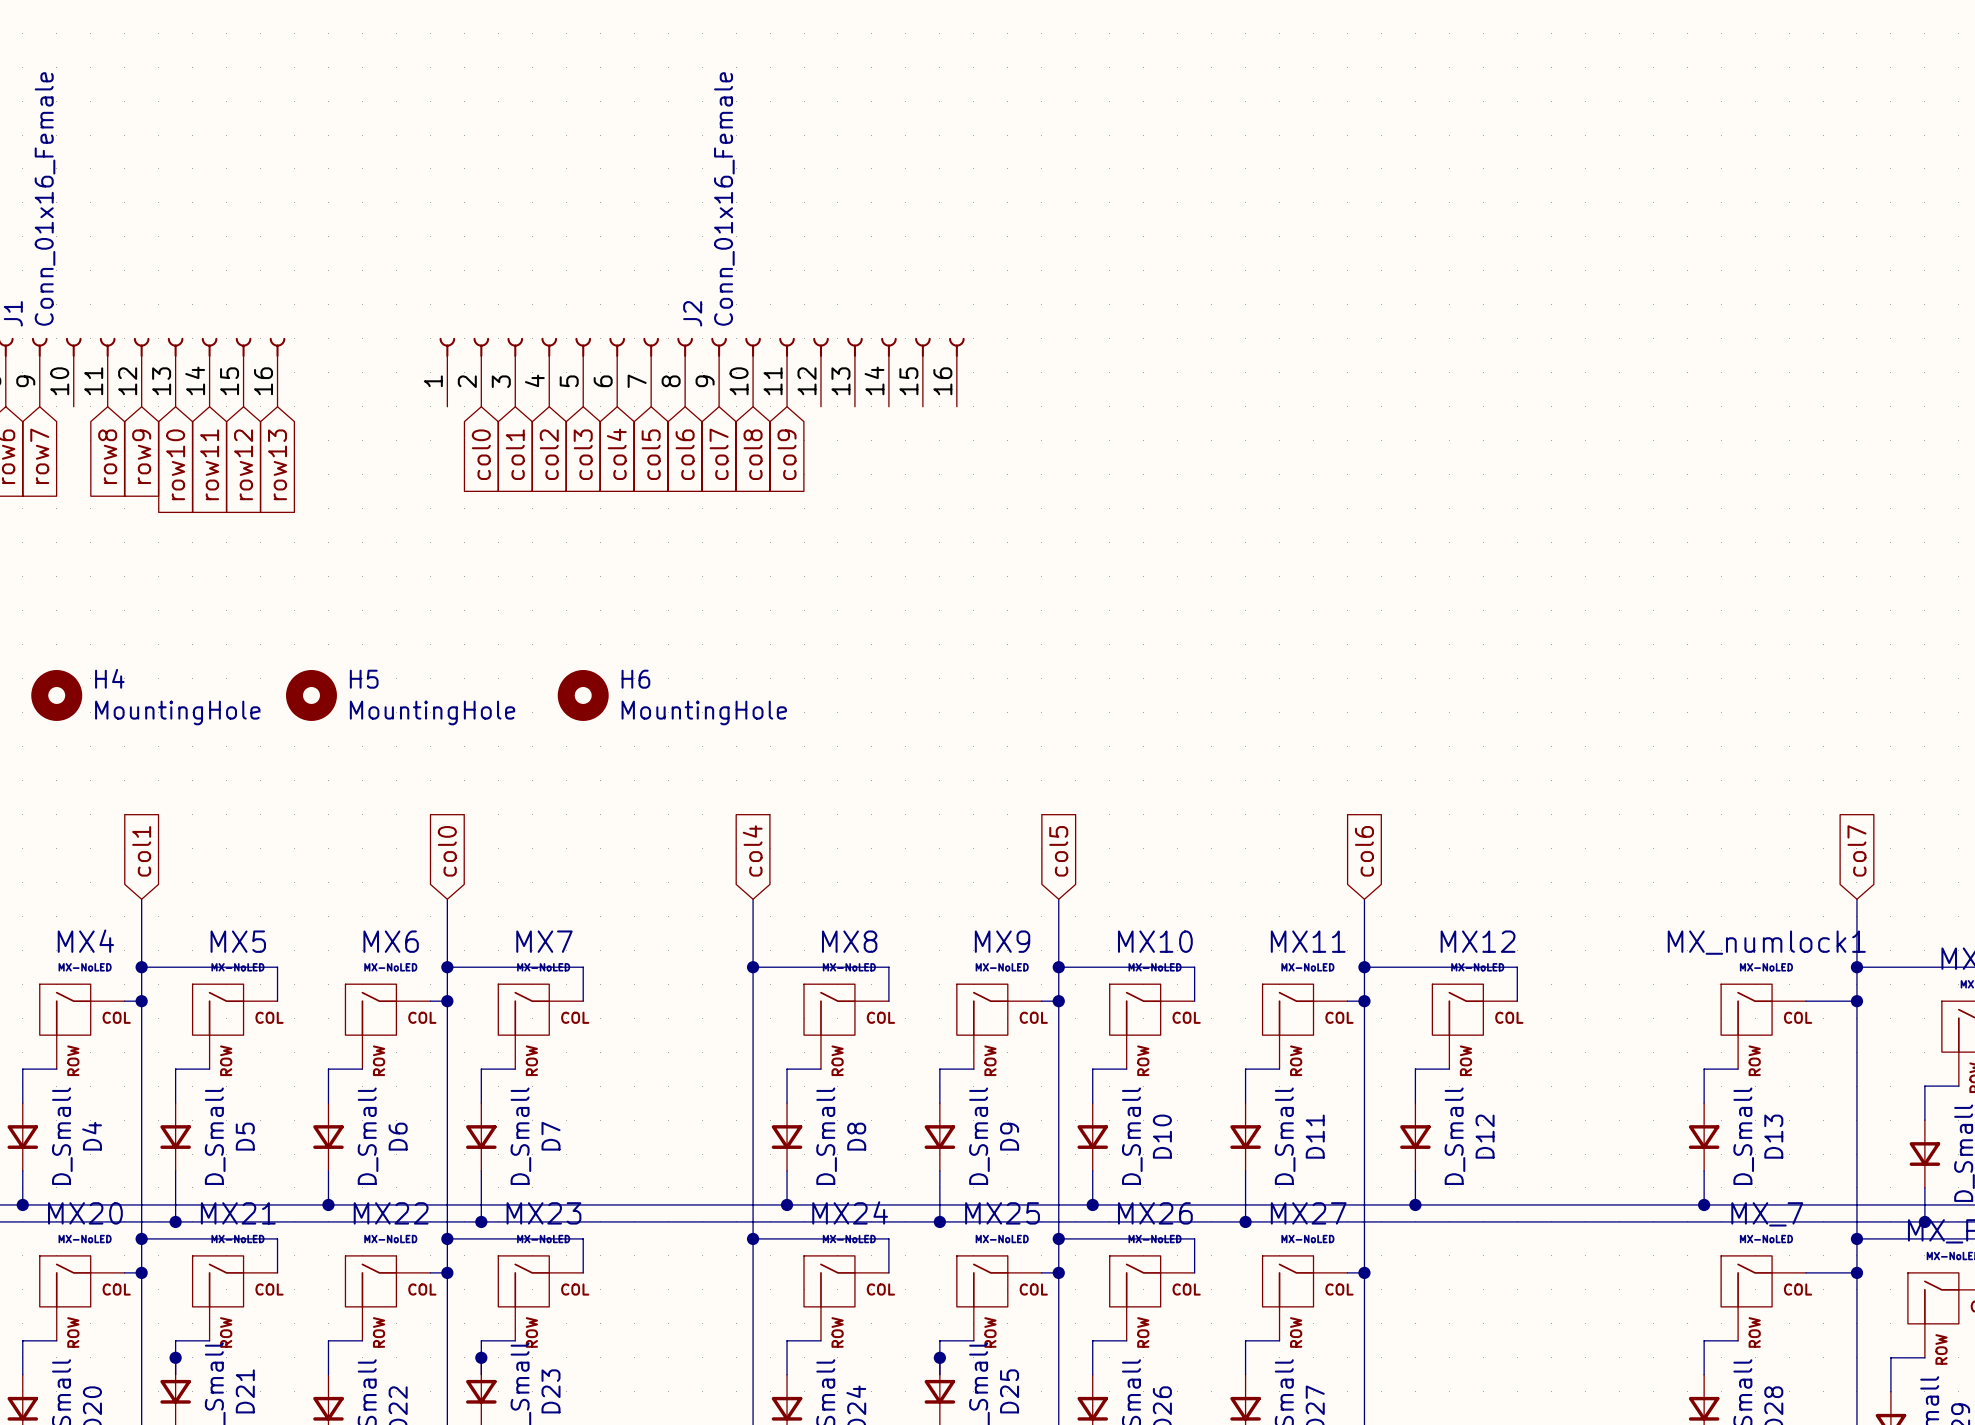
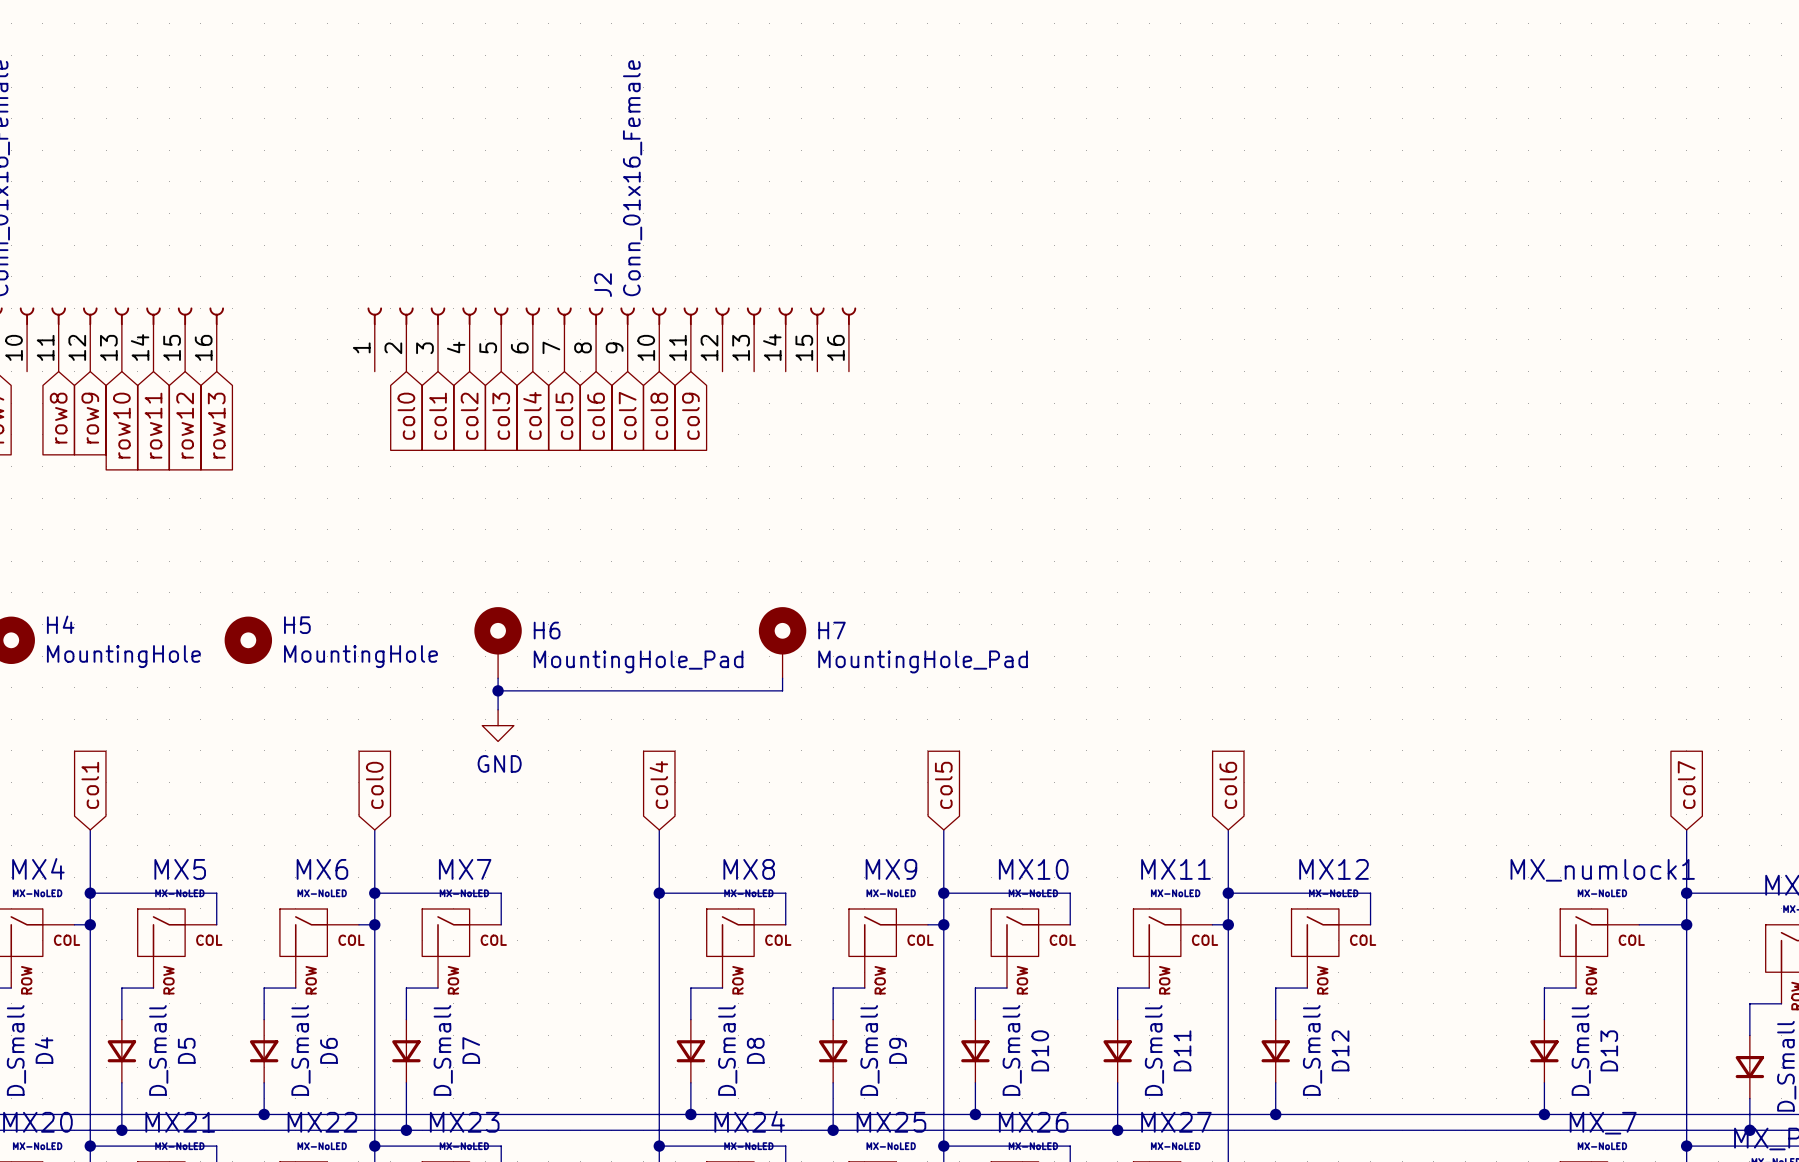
H6 symbol: [557, 670, 609, 721] -> [474, 607, 522, 679]
H7: none -> MountingHole_Pad (782, 642)
H6 value: MountingHole (704, 712) -> MountingHole_Pad (638, 661)
wire: none -> (498, 678) (498, 709)
wire: none -> (782, 678) (782, 690) (498, 690)
junction: none -> (498, 690)
power symbol: none -> GND (498, 725)

